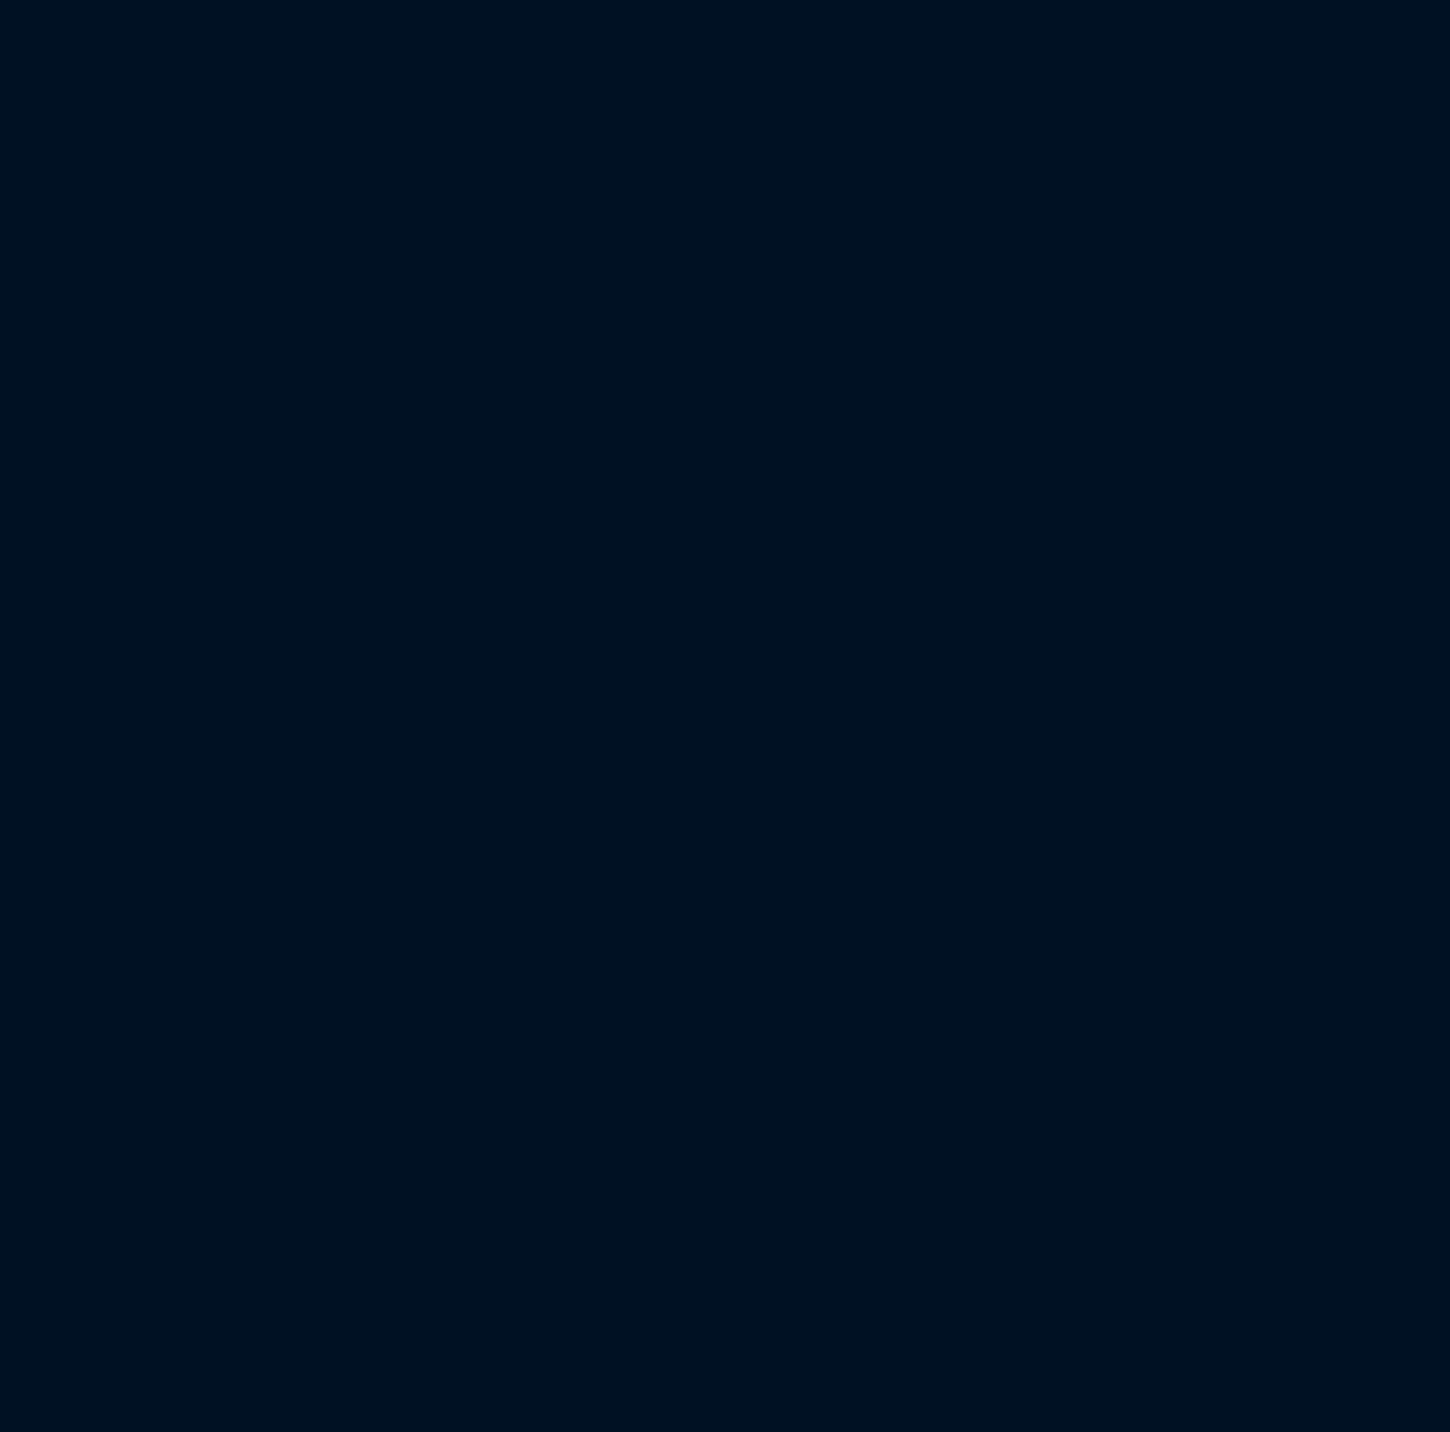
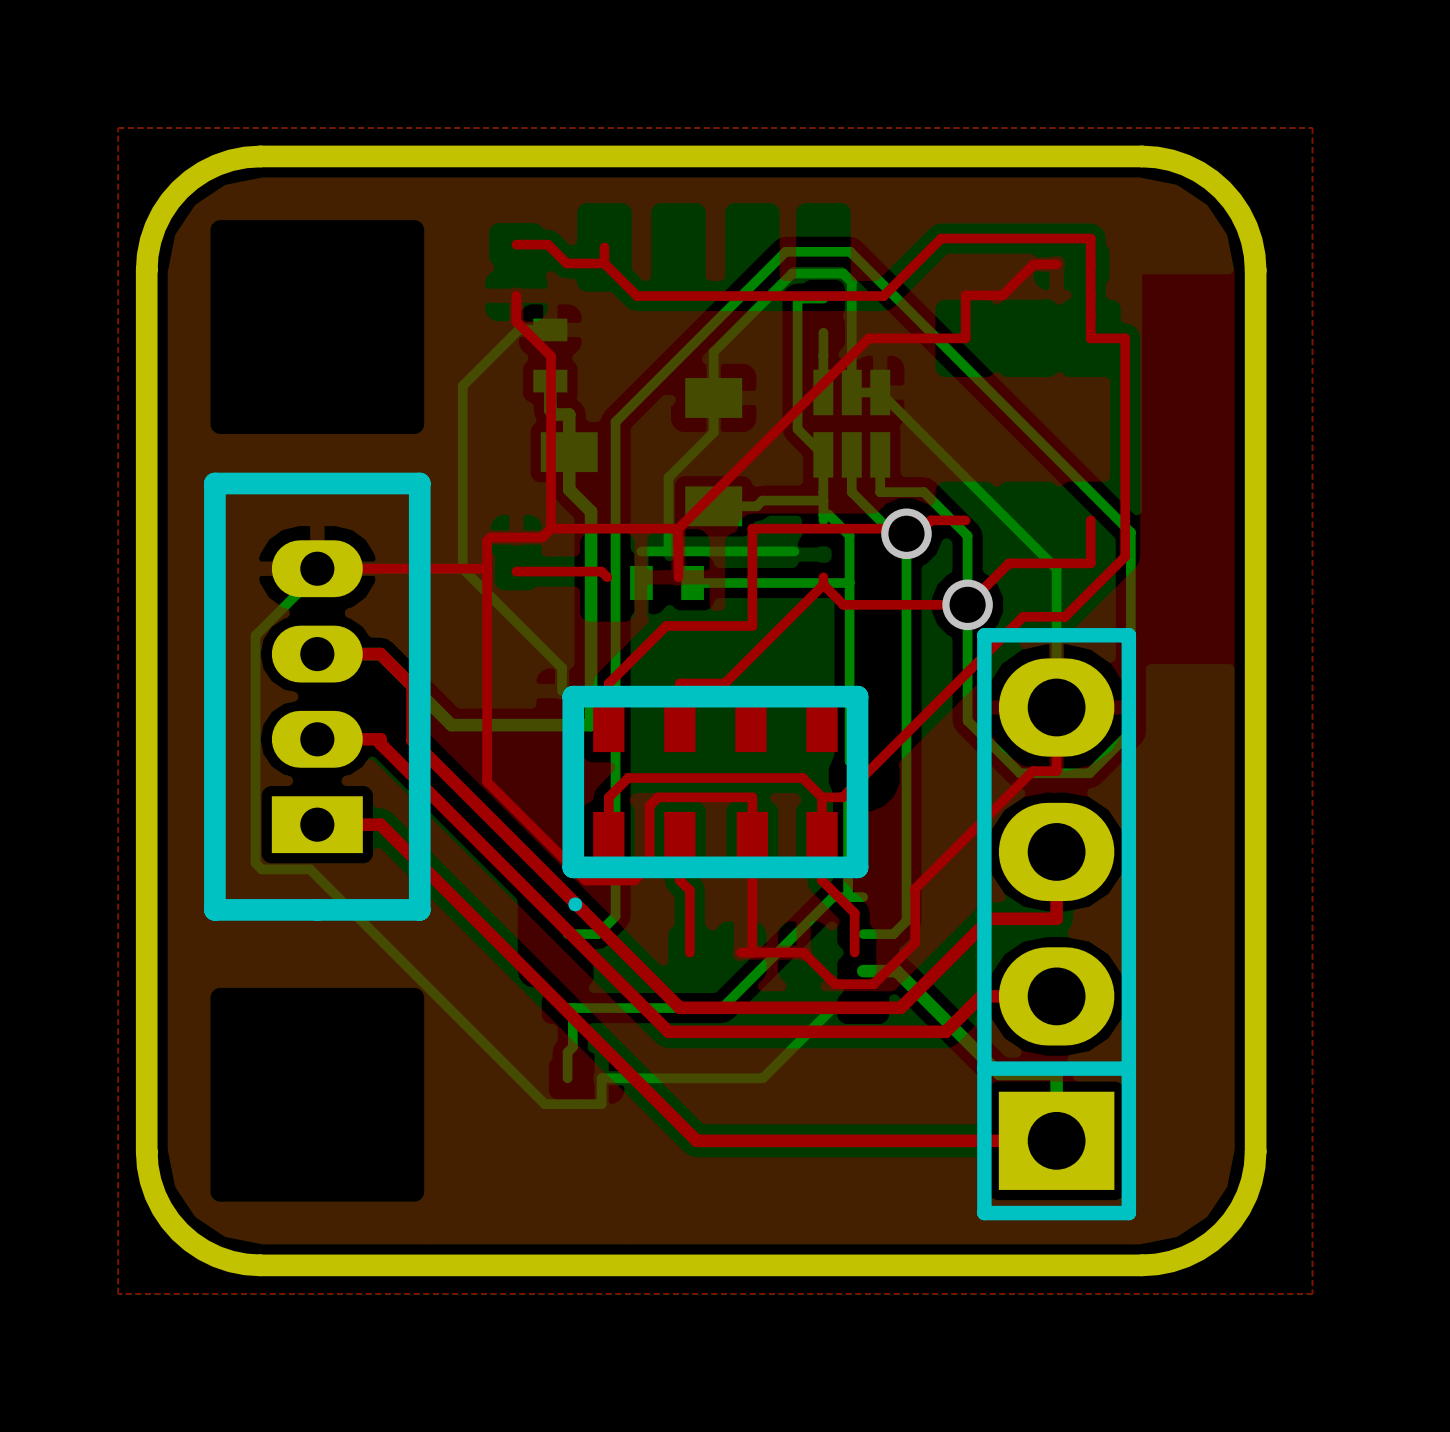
top zone outline: none -> (118, 128) (1312, 128) (1312, 1293) (118, 1293) (118, 128)
board edge: none -> (260, 156) (1141, 156) (1171, 160) (1185, 165) (1211, 179) (1222, 189) (1232, 200) (1246, 226) (1254, 255) (1255, 270) (1255, 1151) (1254, 1166) (1246, 1195) (1232, 1220) (1222, 1232) (1198, 1250) (1185, 1256) (1171, 1261) (1141, 1265) (260, 1265) (231, 1261) (216, 1256) (203, 1250) (180, 1232) (170, 1220) (155, 1195) (147, 1166) (146, 1151) (147, 255) (155, 226) (170, 200) (180, 189) (191, 179) (216, 165) (231, 160) (260, 156)
top track: none -> (516, 244) (547, 244) (566, 263) (604, 263)
top track: none -> (604, 247) (604, 263)
top track: none -> (604, 263) (637, 296) (883, 296) (941, 238) (1090, 238) (1090, 338) (1125, 338) (1125, 556) (1064, 616) (1023, 616) (842, 797) (822, 797)
top track: none -> (1056, 264) (1033, 264) (1002, 295) (965, 295) (965, 338) (868, 338) (678, 528)
top track: none -> (516, 295) (516, 321) (551, 356) (551, 528)
bottom track: none -> (823, 298) (797, 298) (797, 429) (823, 454) (823, 520)
bottom track: none -> (550, 329) (518, 329) (462, 385) (462, 568)
part: none -> (550, 355)
bottom track: none -> (550, 381) (550, 410) (554, 414) (569, 414) (569, 489) (591, 511) (591, 725) (451, 725) (380, 654) (317, 654)
part: none -> (851, 423)
part: none -> (641, 452)
bottom track: none -> (851, 454) (851, 492) (893, 533) (906, 533) (906, 921) (893, 934) (863, 934)
bottom track: none -> (880, 454) (880, 492) (923, 492) (967, 535) (967, 720) (1020, 773) (1089, 773) (1130, 732) (1130, 532) (850, 251) (785, 251) (615, 421) (615, 916) (597, 934) (567, 934)
bottom track: none -> (823, 500) (762, 500) (756, 506) (713, 506)
bottom track: none -> (823, 514) (828, 514) (849, 535) (849, 761) (864, 775) (848, 791) (848, 897)
top track: none -> (965, 520) (931, 520) (922, 528) (752, 528) (752, 625) (666, 625) (608, 683) (608, 725)
top track: none -> (1090, 520) (1090, 563) (1009, 563) (967, 604) (843, 604) (823, 584)
top track: none -> (551, 528) (678, 528)
top track: none -> (551, 528) (542, 537) (490, 537) (487, 540) (487, 782) (585, 880) (634, 880) (649, 865) (649, 805) (658, 797) (752, 797) (752, 952)
top track: none -> (678, 528) (678, 577)
via: none -> (906, 533)
bottom track: none -> (641, 551) (794, 551)
bottom track: none -> (668, 551) (668, 477) (713, 432) (713, 352) (792, 273) (843, 273) (851, 282) (851, 392) (880, 392) (1056, 568) (1056, 707)
top track: none -> (317, 568) (487, 568)
bottom track: none -> (322, 568) (255, 635) (255, 863) (261, 869) (310, 869) (544, 1104) (601, 1104) (601, 1078) (762, 1078) (832, 1008) (863, 1008)
bottom track: none -> (462, 568) (562, 668) (562, 691)
top track: none -> (516, 571) (601, 571) (607, 577)
top track: none -> (823, 577) (823, 584)
part: none -> (667, 583)
bottom track: none -> (692, 583) (849, 583)
top track: none -> (823, 584) (724, 683) (679, 683) (679, 725)
via: none -> (967, 604)
top track: none -> (317, 654) (380, 654) (412, 686) (412, 740) (679, 1007) (900, 1007) (989, 918) (1056, 918) (1056, 851)
part: none -> (317, 696)
top track: none -> (1056, 707) (1056, 771) (1032, 771) (915, 888) (915, 942) (873, 984) (835, 984) (803, 952) (740, 952)
top track: none -> (317, 739) (380, 739) (380, 743) (668, 1031) (945, 1031) (981, 996) (1056, 996)
part: none -> (715, 782)
top track: none -> (822, 797) (822, 880) (854, 913) (854, 952)
top track: none -> (822, 797) (802, 777) (628, 777) (608, 797) (608, 838)
top track: none -> (317, 824) (380, 824) (696, 1140) (1056, 1140)
top track: none -> (679, 838) (679, 880) (689, 890) (689, 952)
bottom track: none -> (863, 897) (832, 897) (722, 1008) (567, 1008)
part: none -> (1056, 924)
bottom track: none -> (863, 971) (896, 971) (999, 1074) (1056, 1074) (1056, 1140)
bottom track: none -> (572, 1008) (572, 1047) (567, 1052) (567, 1078)

